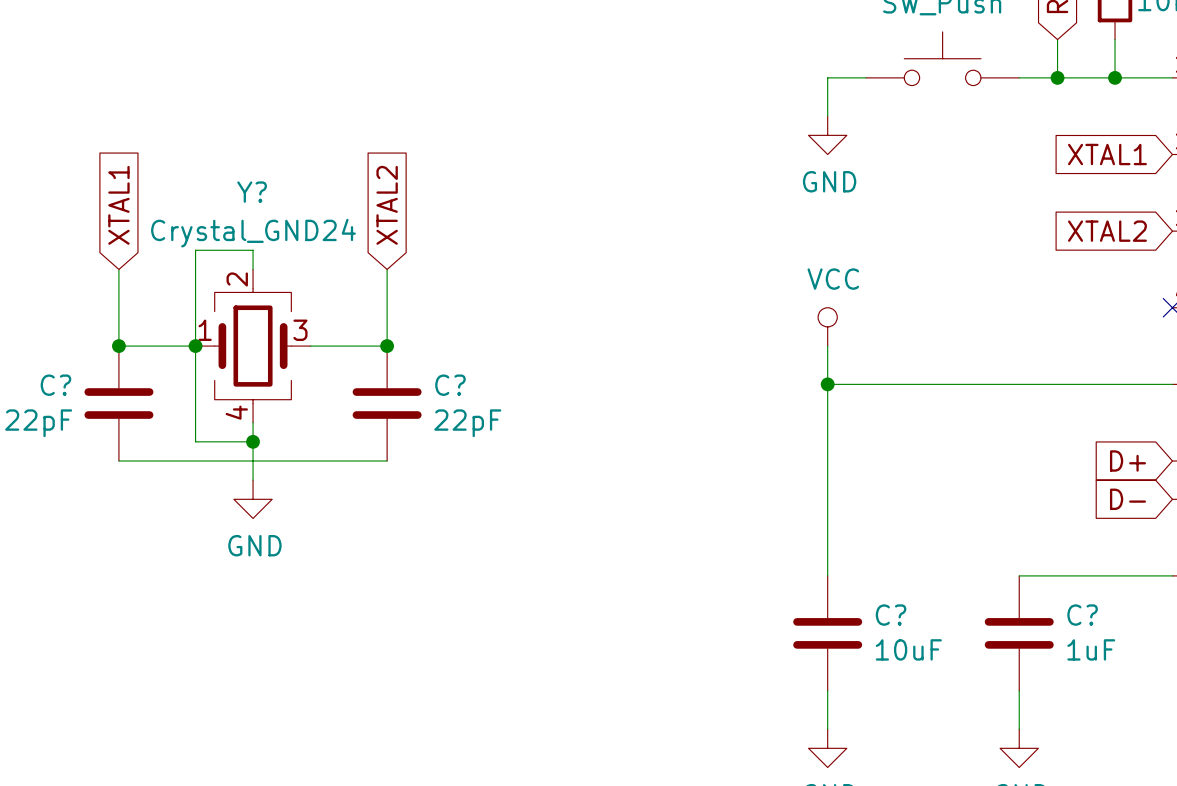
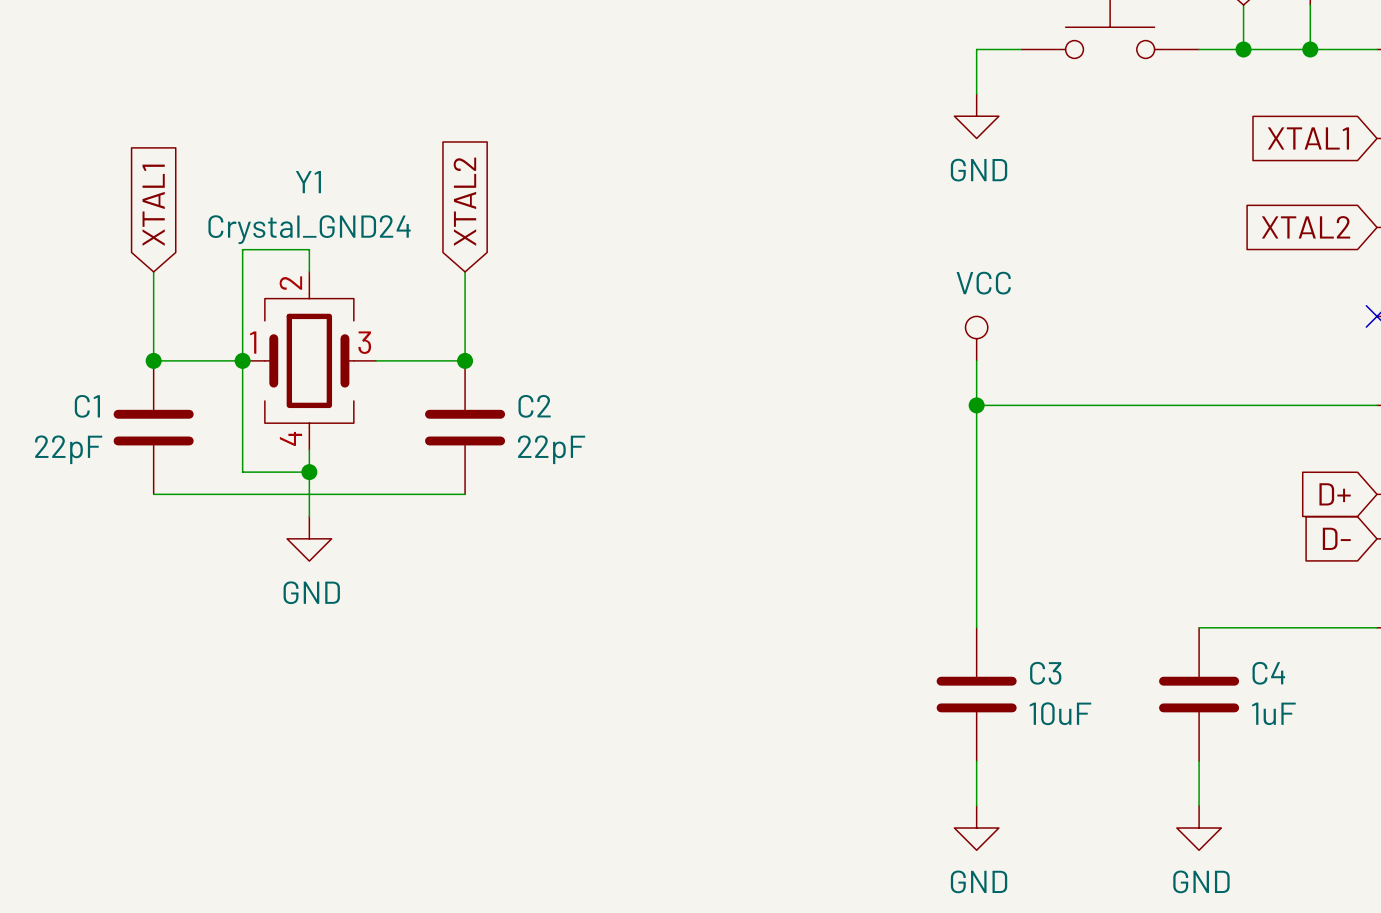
Y? name: Y? (252, 192) -> Y1 (308, 182)
C? name: C? (55, 385) -> C1 (87, 406)
C? name: C? (450, 385) -> C2 (534, 406)
C? name: C? (891, 615) -> C3 (1045, 673)
C? name: C? (1082, 615) -> C4 (1268, 673)

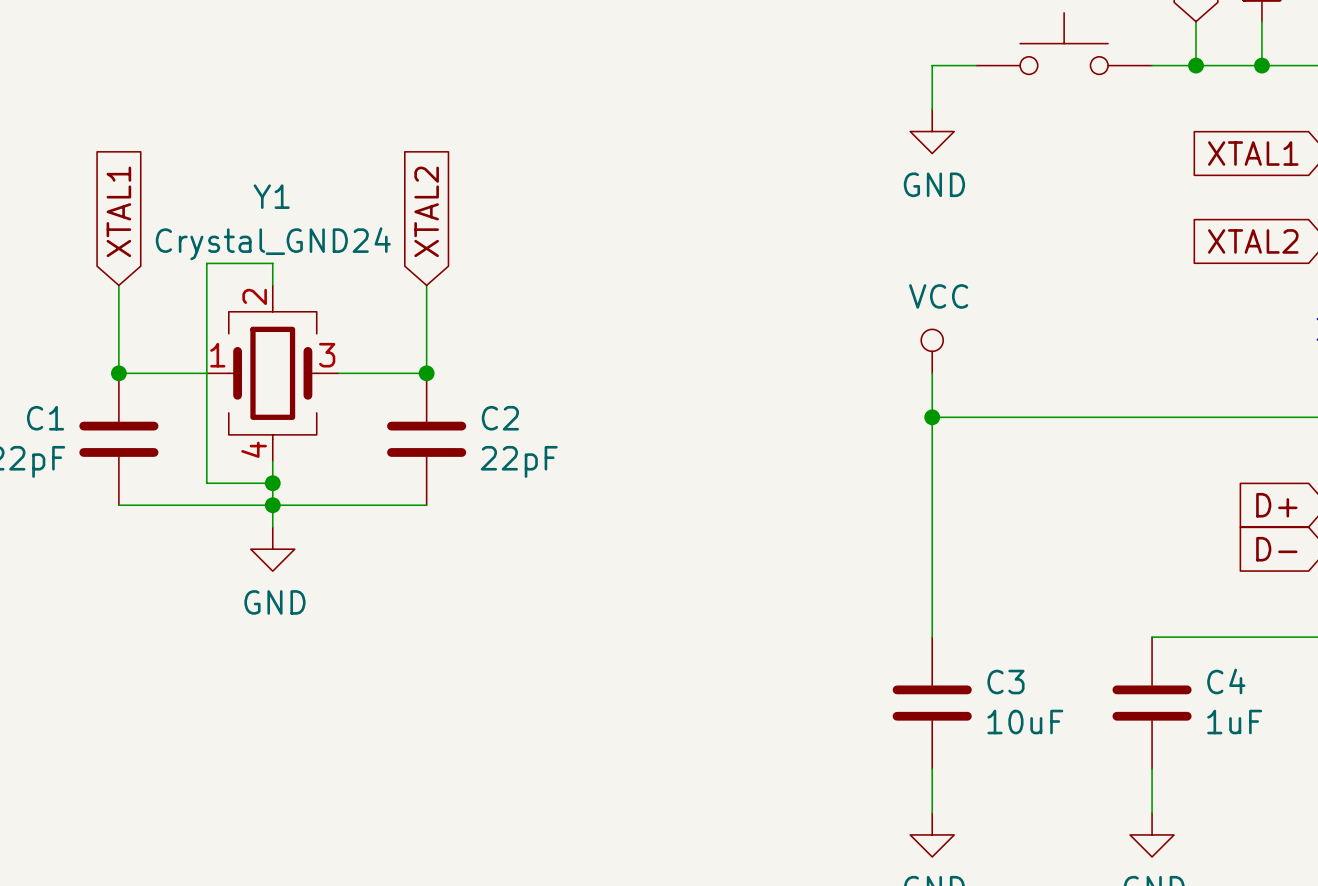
junction: (242, 360) -> none
junction: none -> (272, 505)

